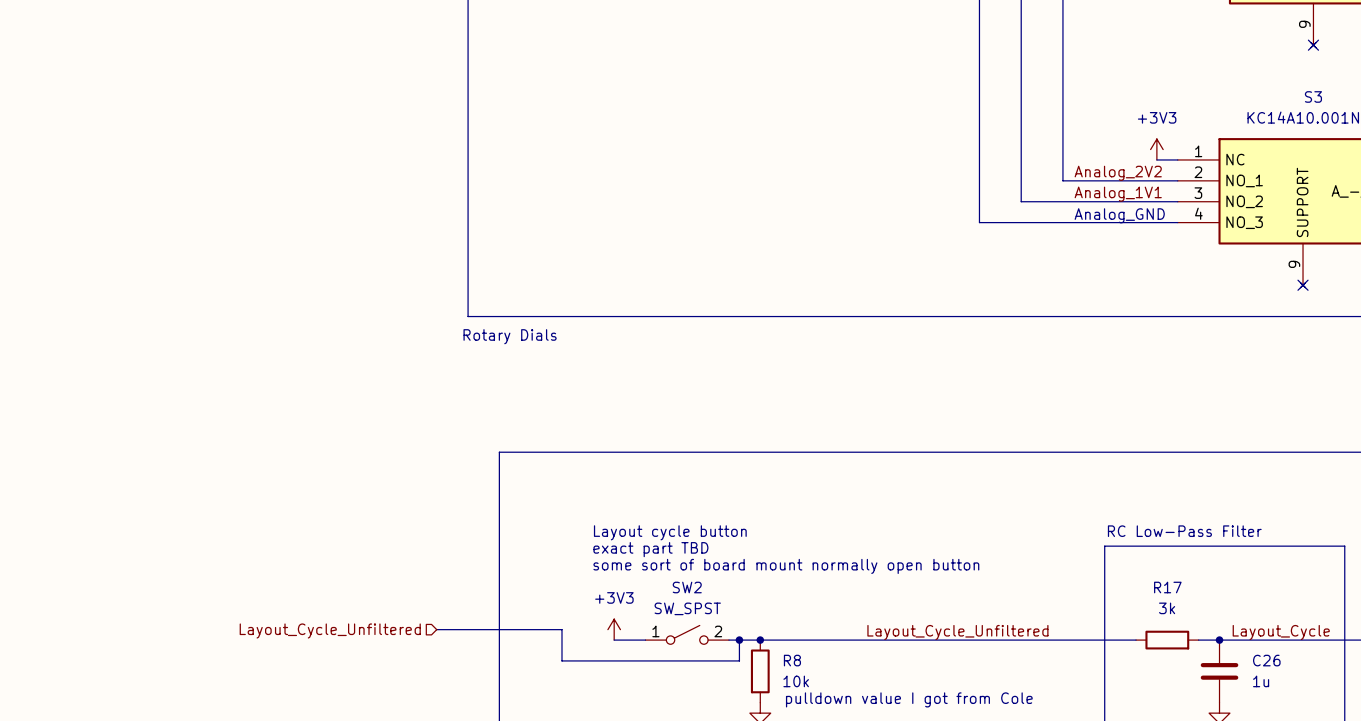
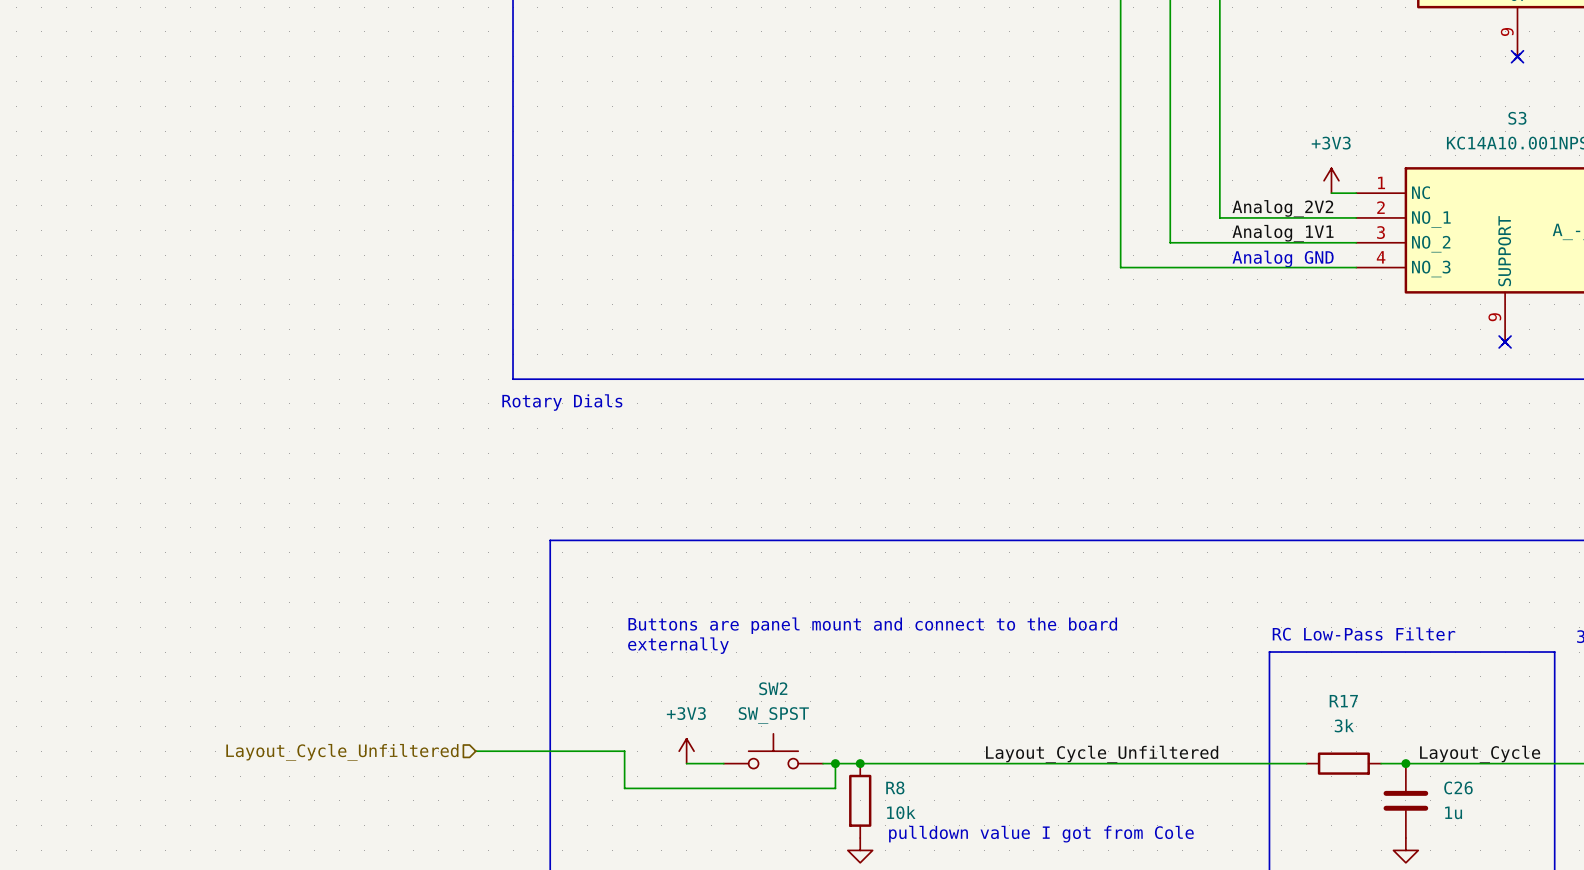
text: none -> Buttons are panel mount and connect to the board (872, 625)
text: Layout cycle button (670, 532) -> none
text: none -> externally (678, 645)
text: exact part TBD (650, 549) -> none
text: some sort of board mount normally open button (786, 566) -> none
SW2 symbol: [645, 625, 729, 645] -> [723, 733, 824, 769]

